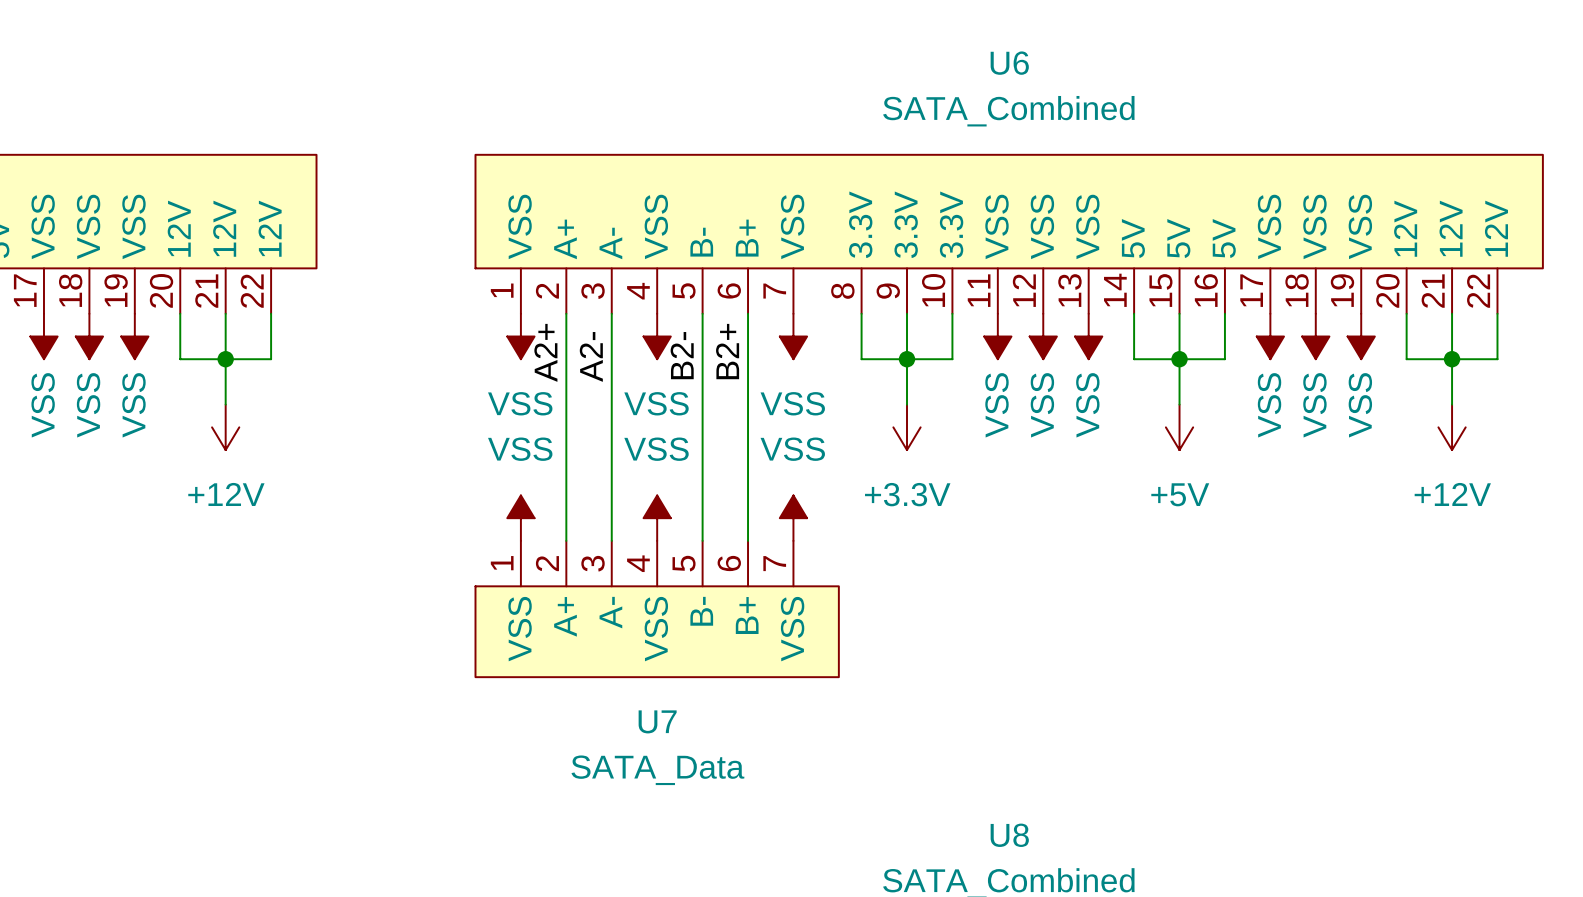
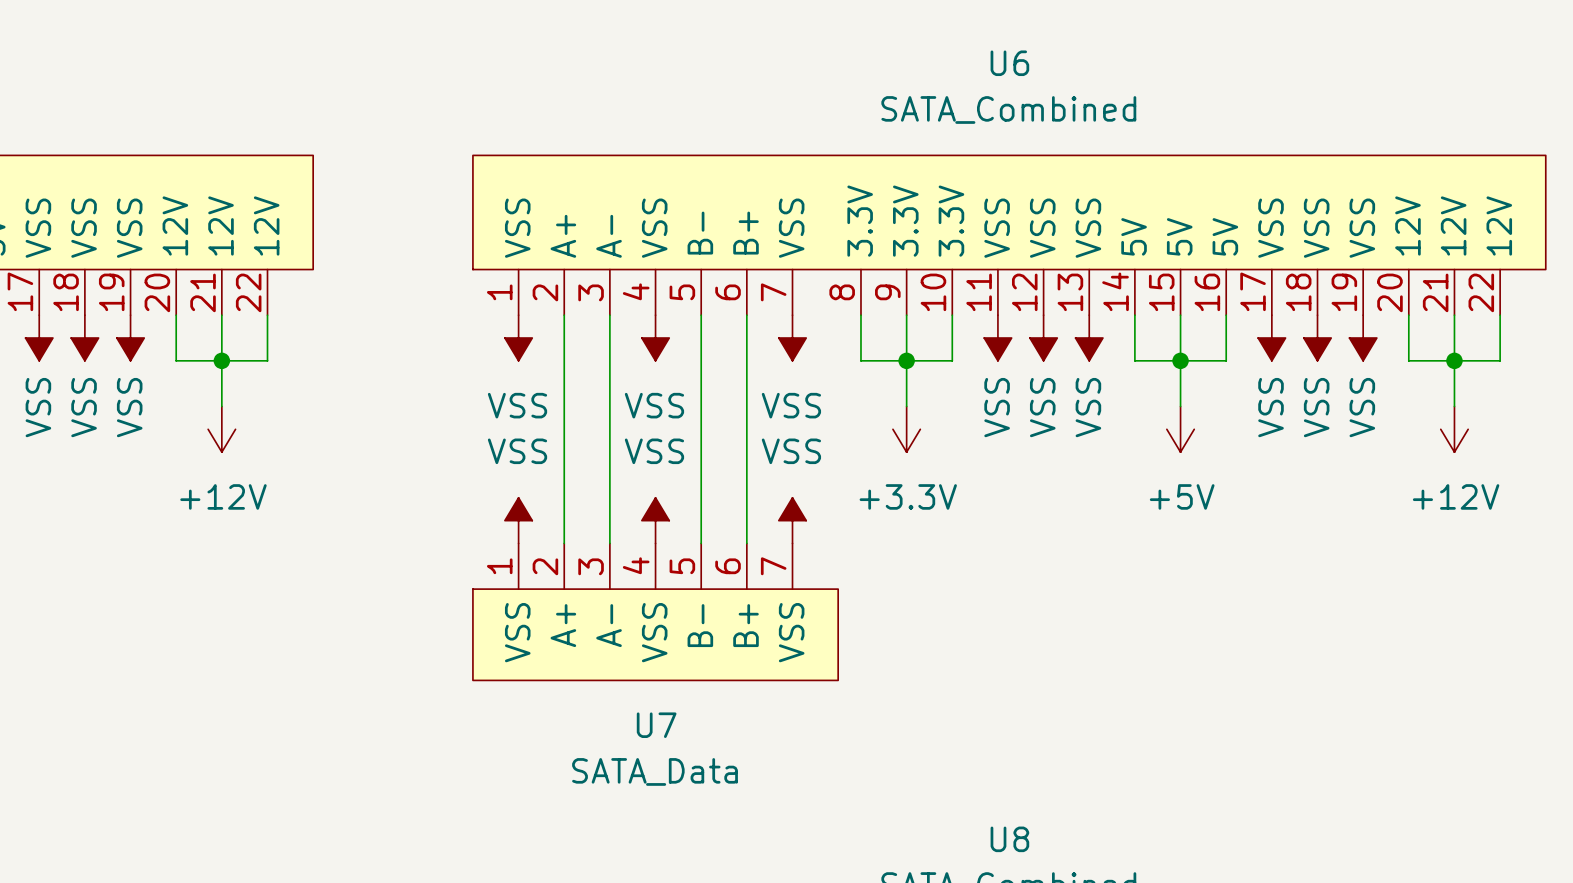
label: B2+ (727, 351) -> none
label: A2+ (545, 352) -> none
label: B2- (682, 355) -> none
label: A2- (591, 356) -> none

